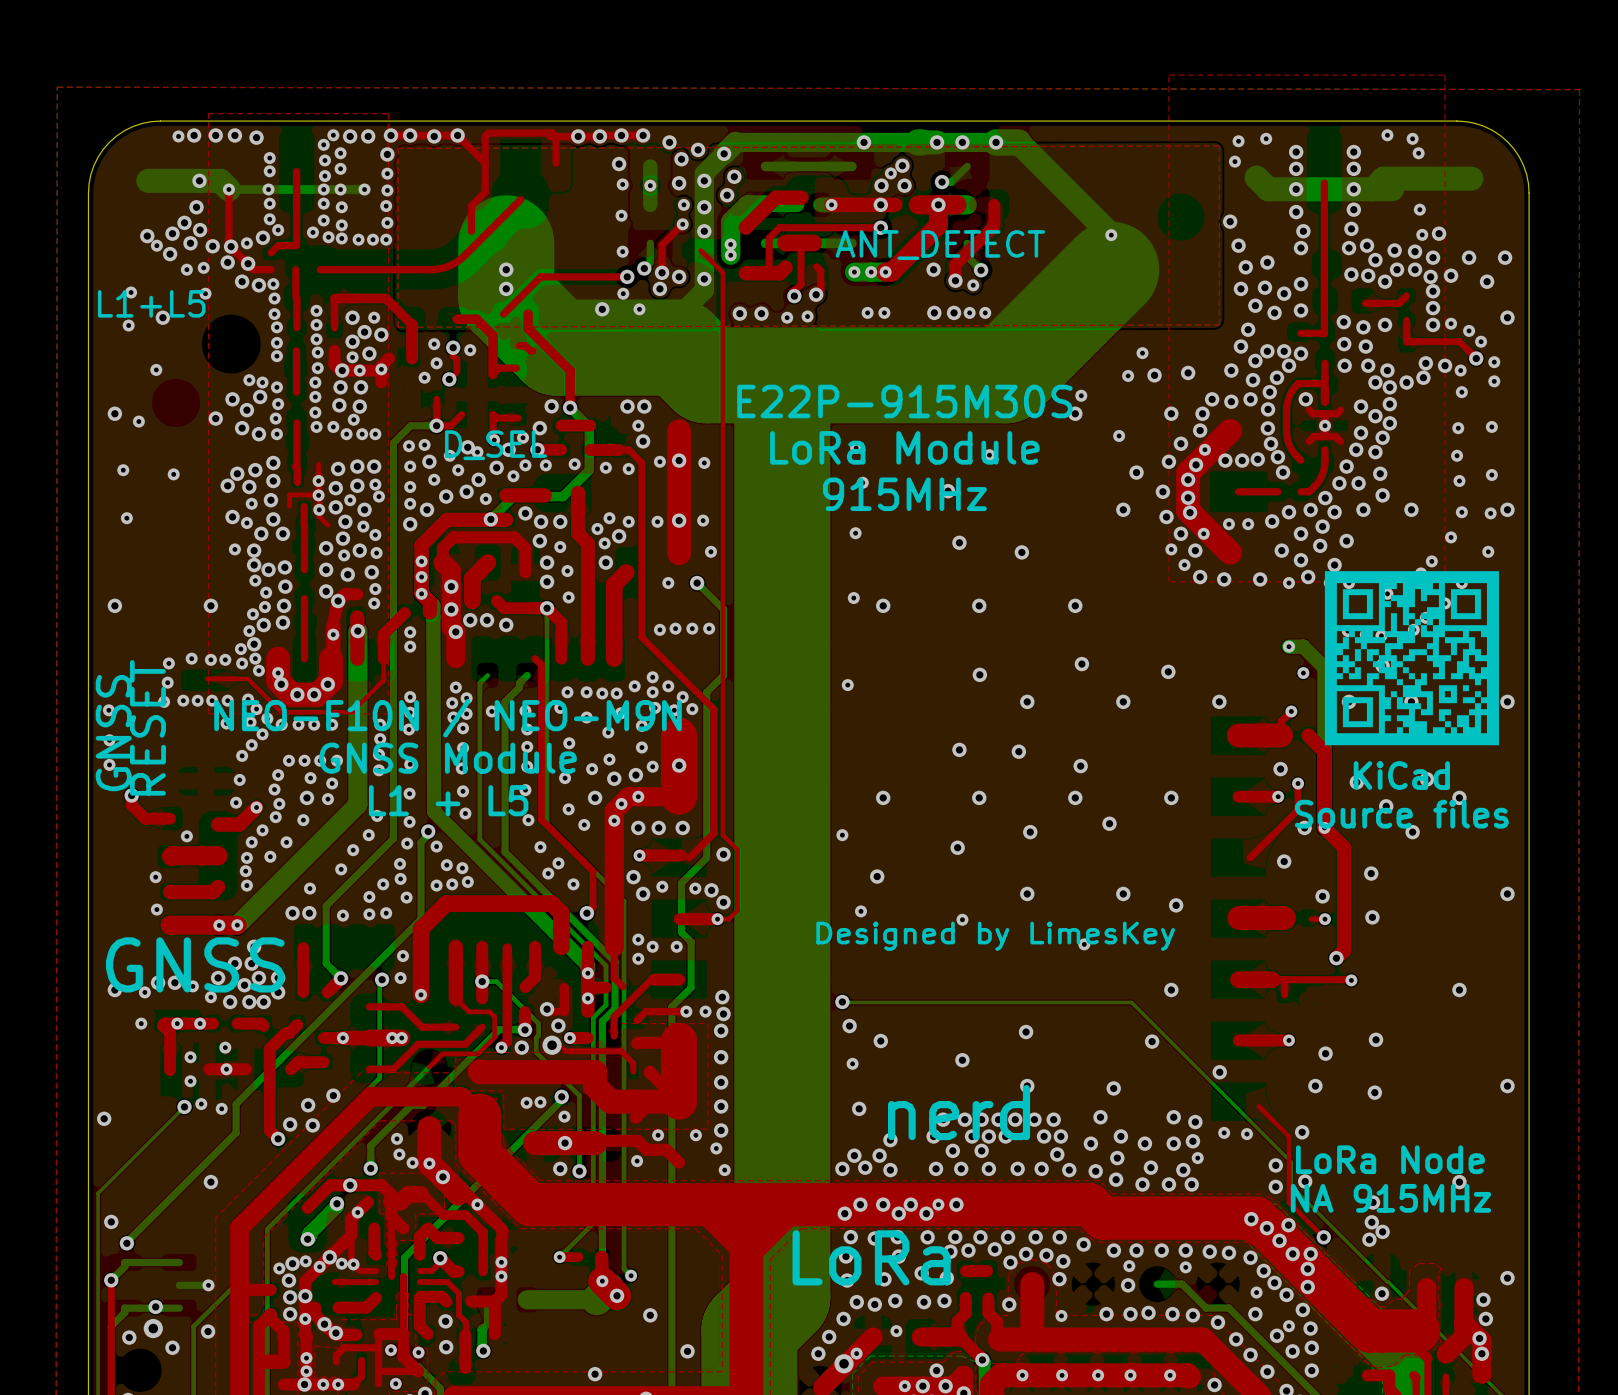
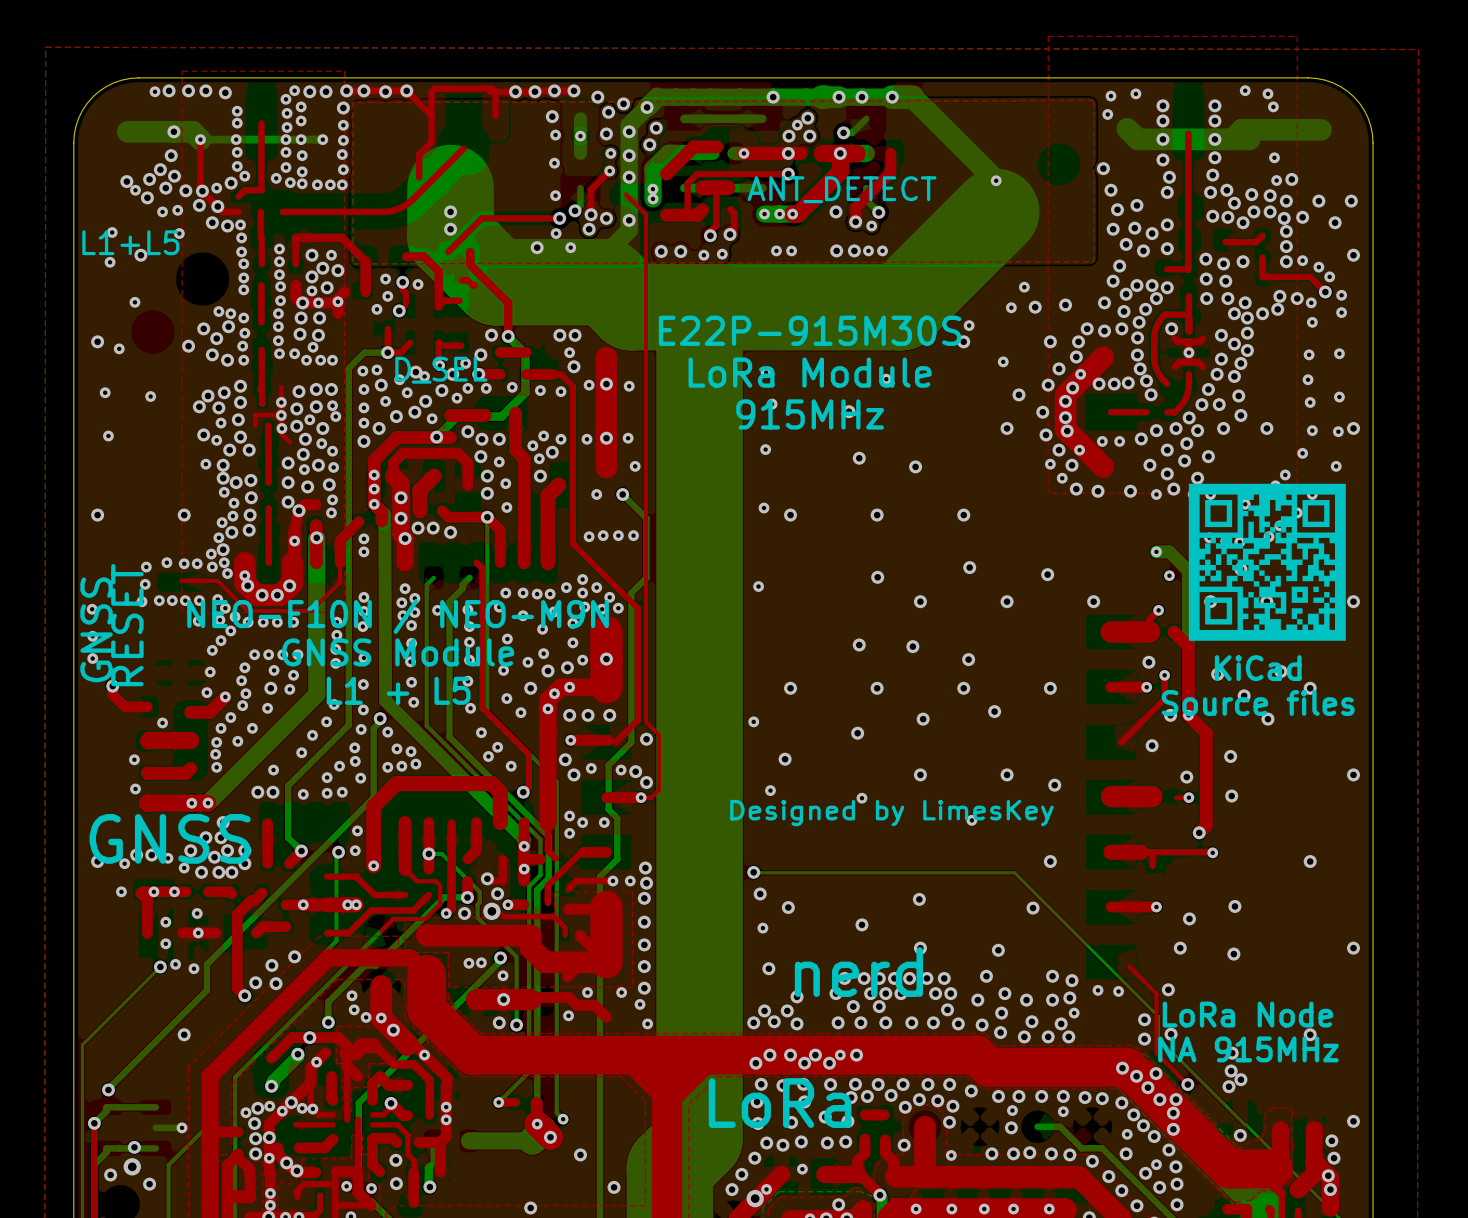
via: (1219, 1072) -> none
via: (104, 1118) -> none
via: (111, 1221) -> none
via: (208, 1331) -> none

